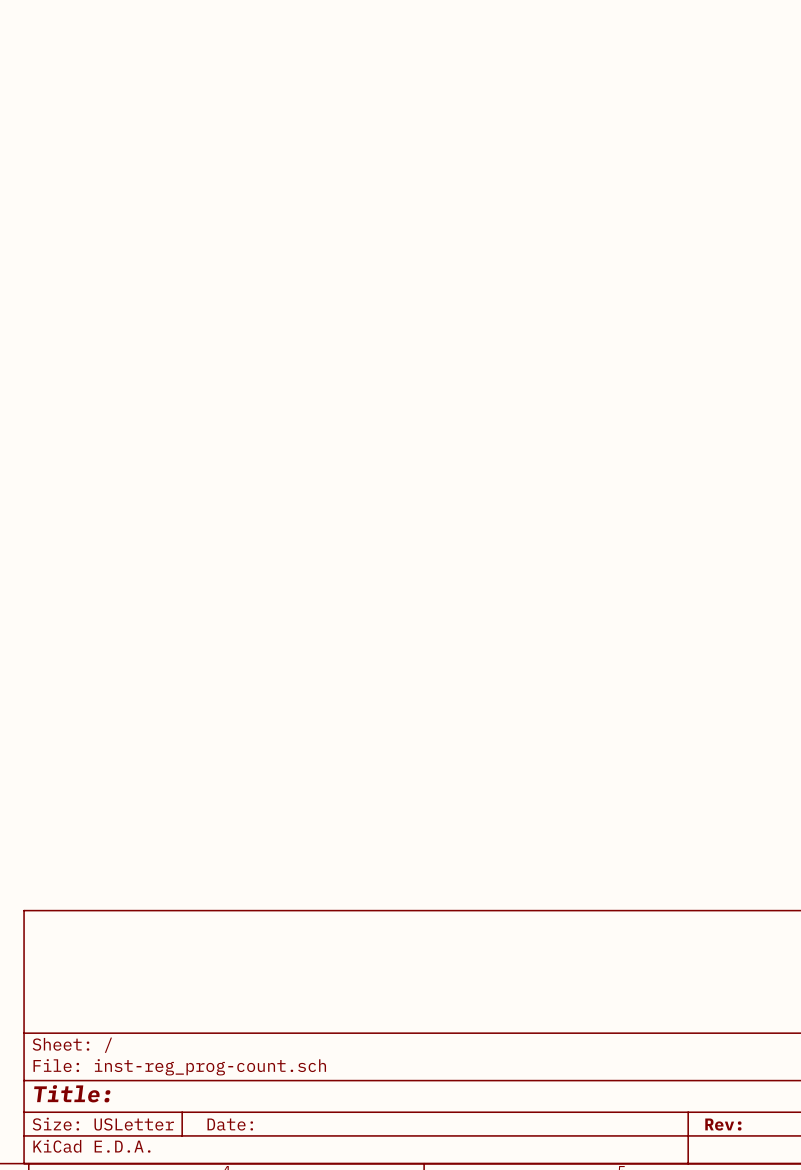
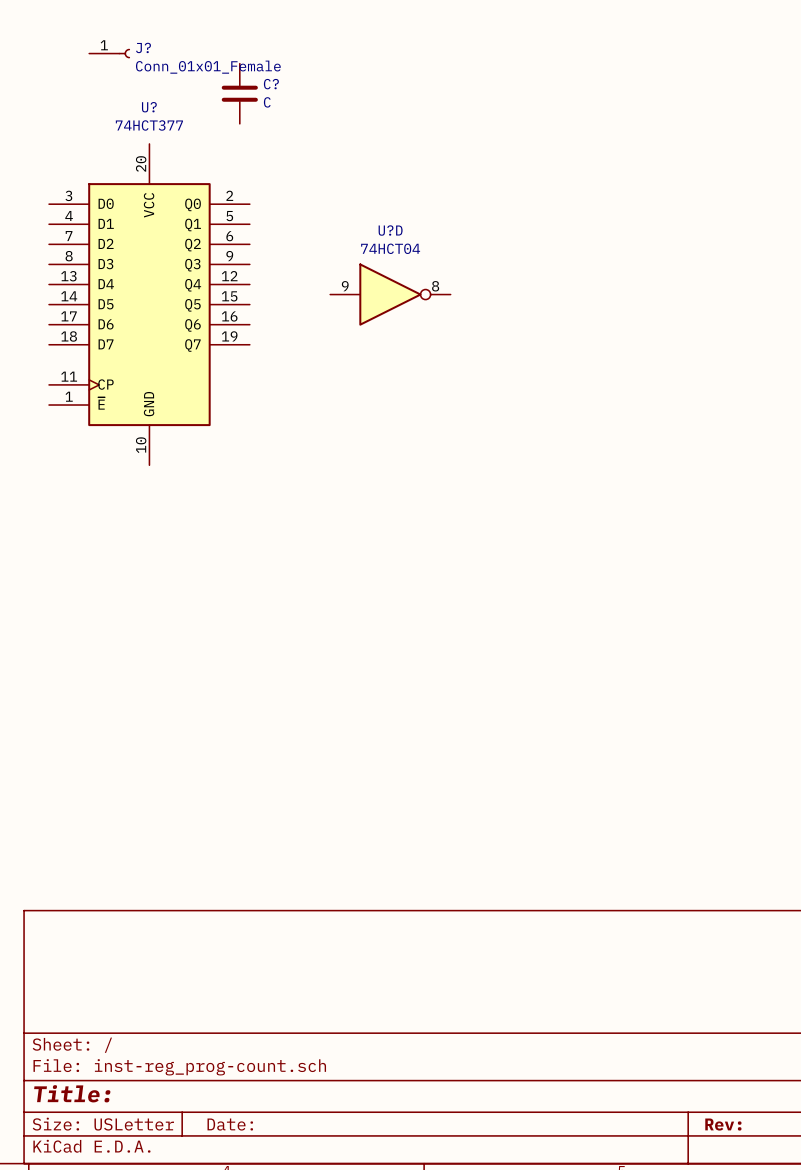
J?: none -> Conn_01x01_Female (109, 53)
C?: none -> C (239, 93)
U?D: none -> 74HCT04 (390, 294)
U?: none -> 74HCT377 (149, 304)

